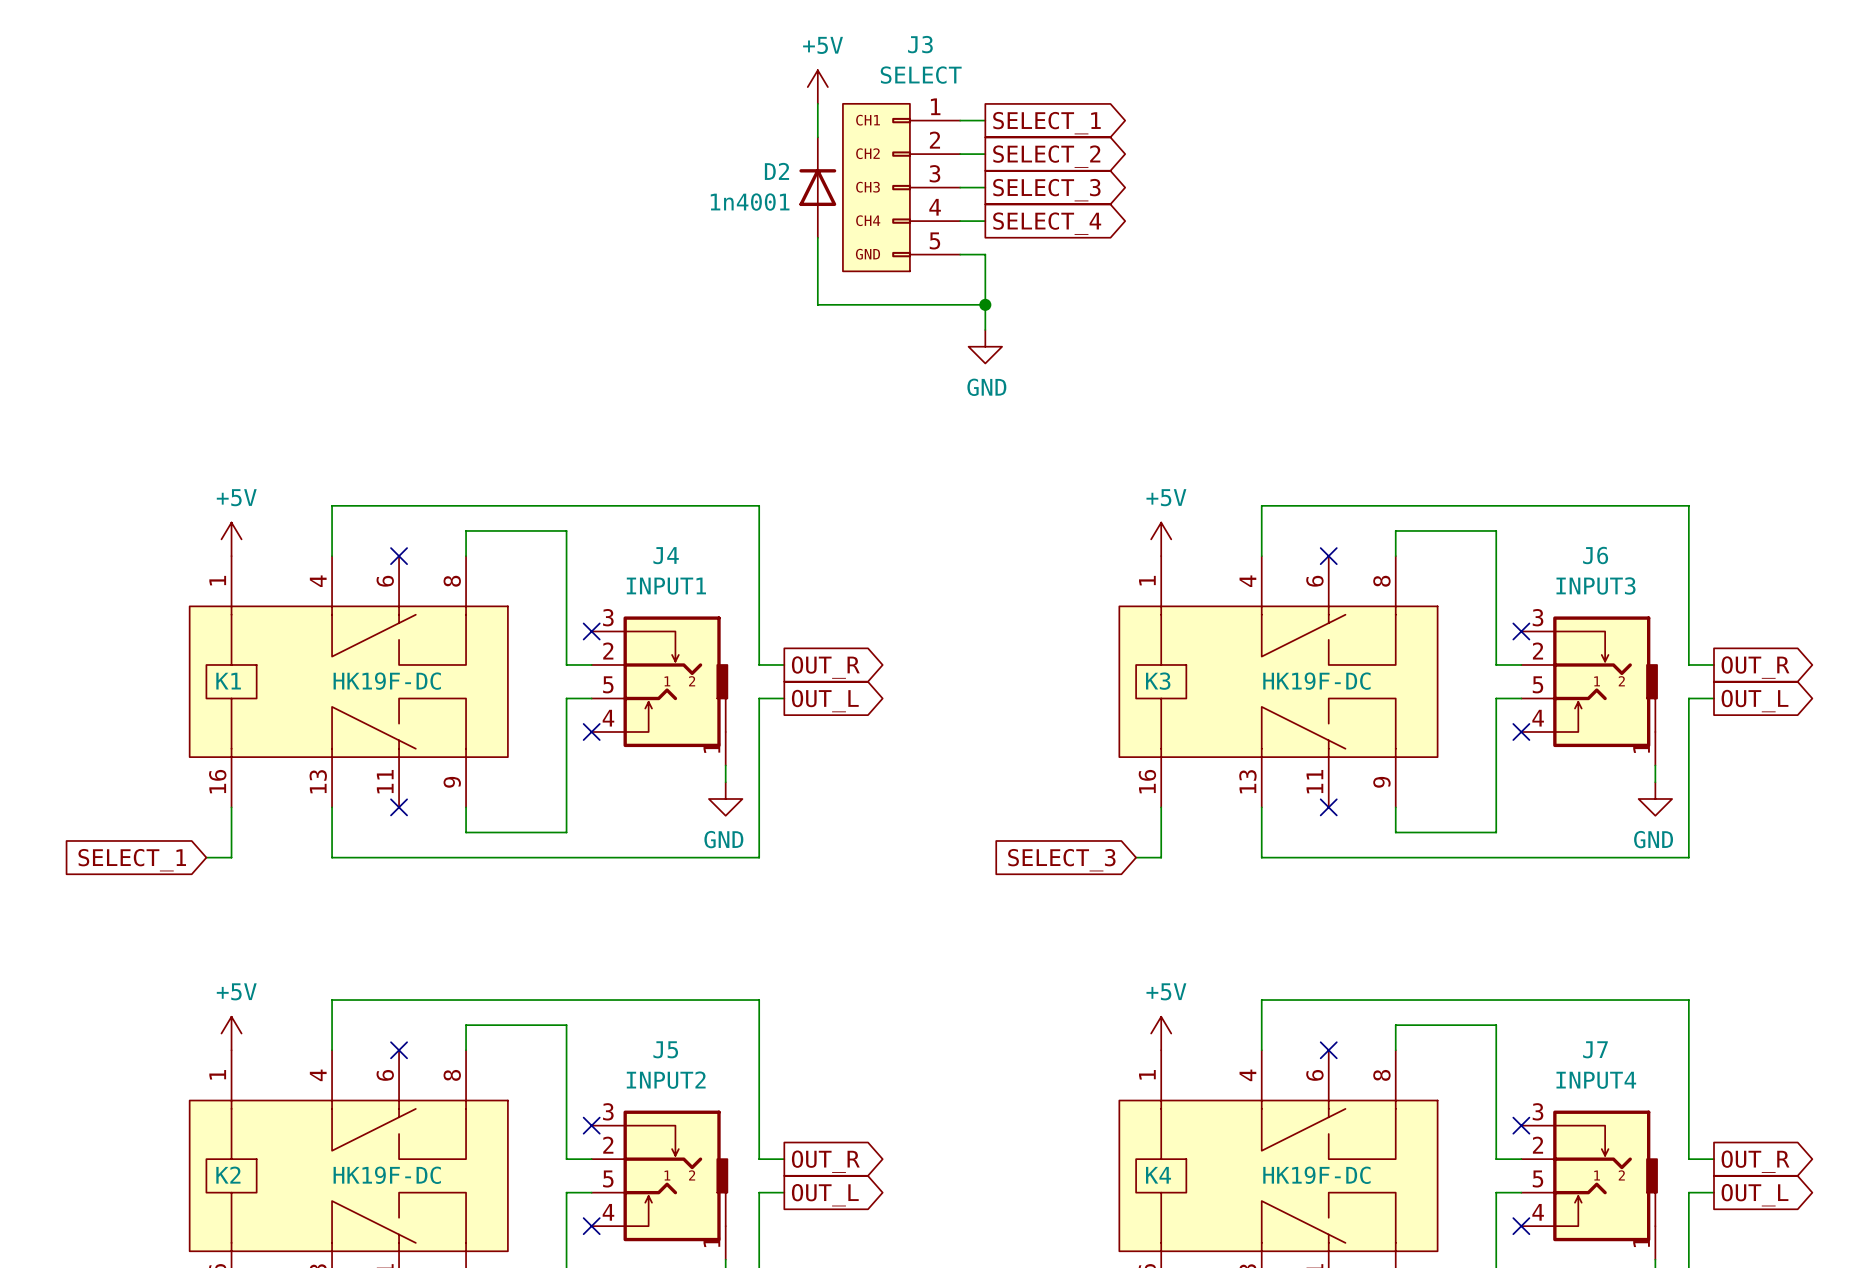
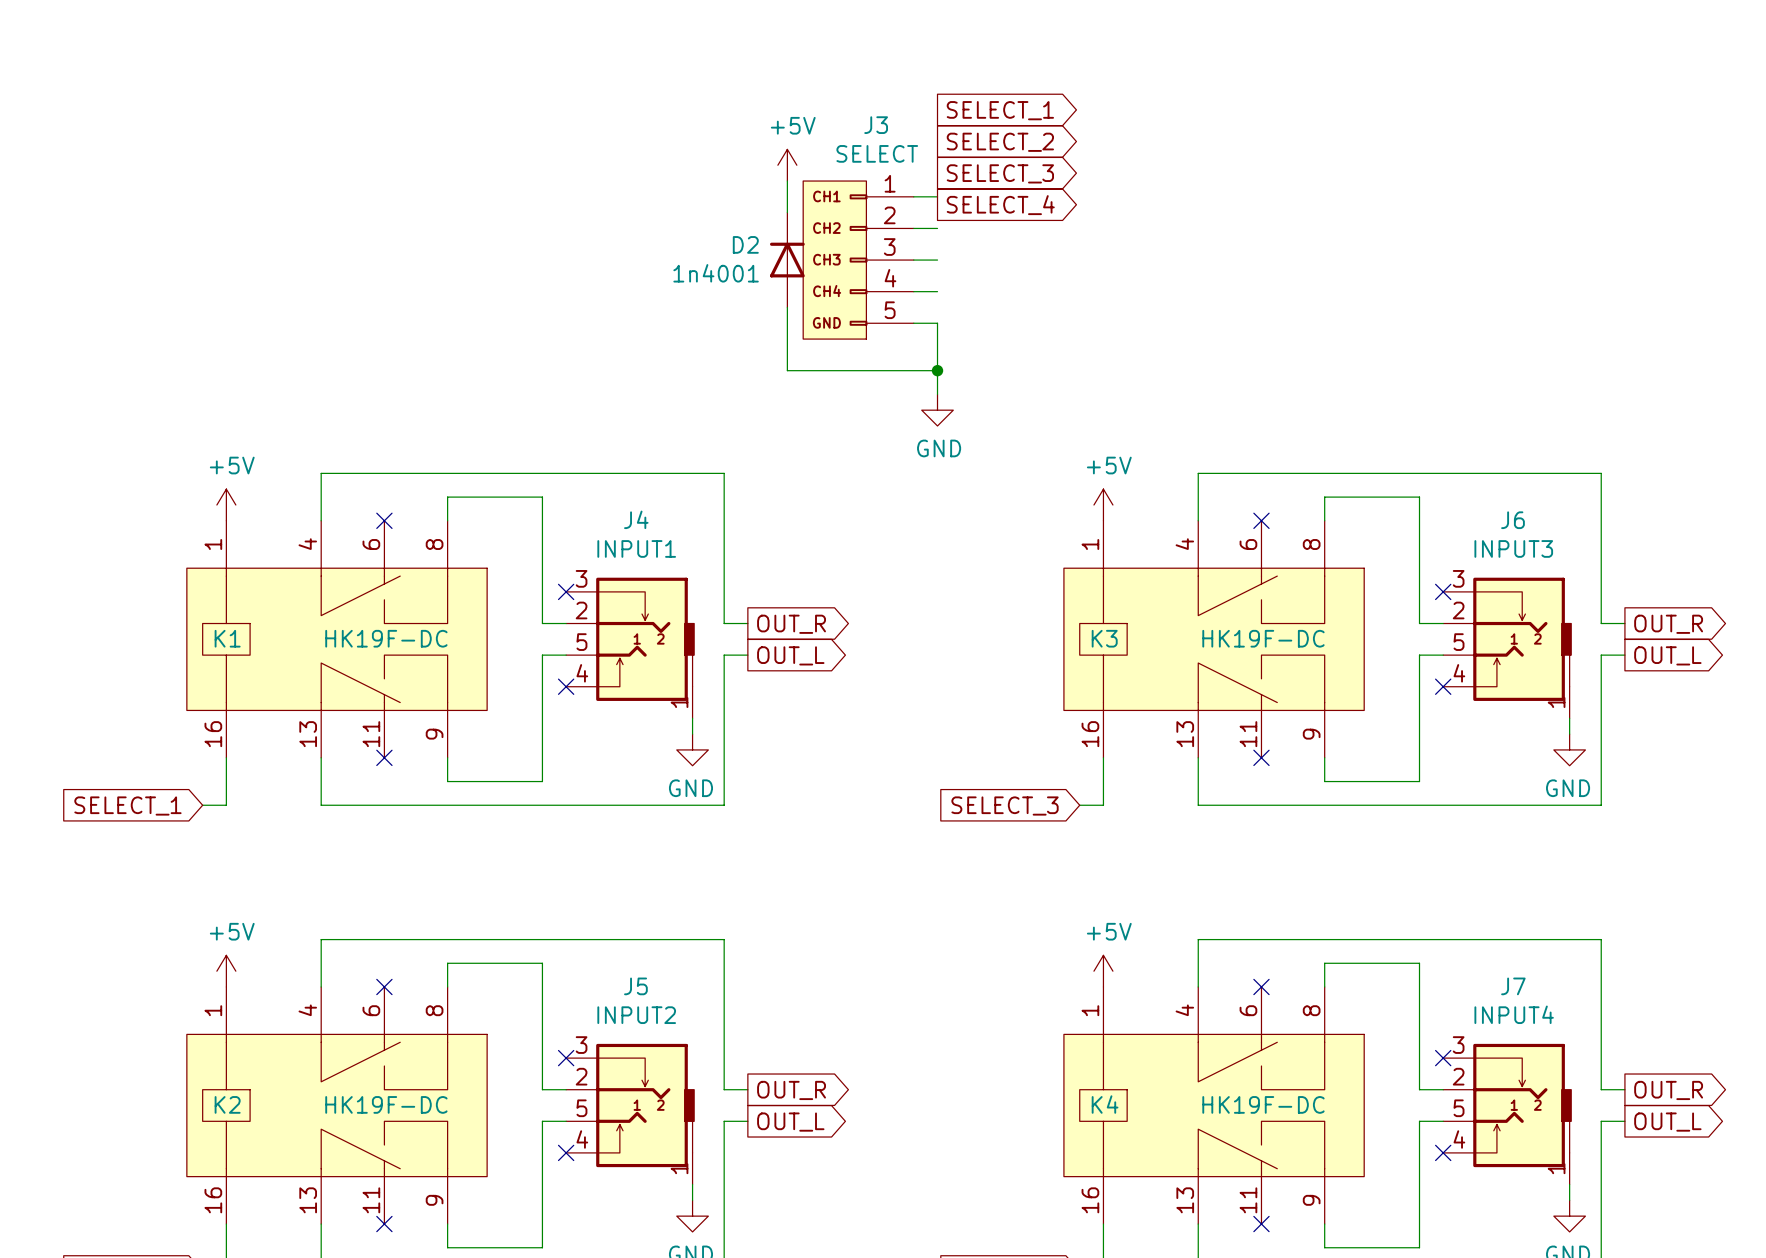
power symbol position: +5V (817, 87) -> +5V (787, 165)
wire: (817, 103) (817, 137) -> (787, 181) (787, 212)
wire: (960, 120) (985, 120) -> (913, 196) (937, 196)
wire: (960, 154) (985, 154) -> (913, 228) (937, 228)
D2 position: (817, 187) -> (787, 260)
J3 position: (901, 187) -> (858, 260)
wire: (960, 187) (985, 187) -> (913, 260) (937, 260)
wire: (960, 221) (985, 221) -> (913, 291) (937, 291)
wire: (817, 237) (817, 304) (985, 304) -> none
wire: (960, 254) (985, 254) (985, 329) -> (913, 323) (937, 323) (937, 394)
junction: (985, 304) -> none
wire: none -> (787, 307) (787, 370) (937, 370)
power symbol position: GND (985, 346) -> GND (937, 410)
junction: none -> (937, 370)

